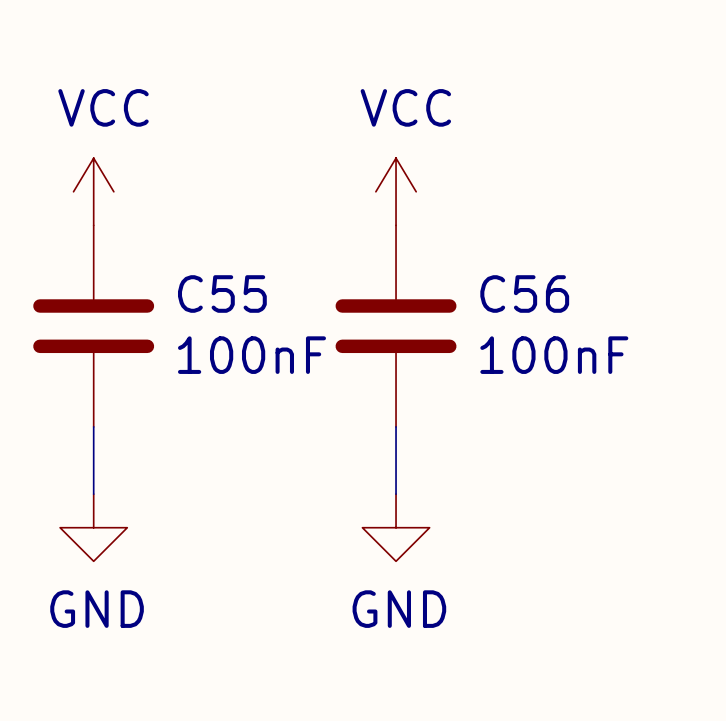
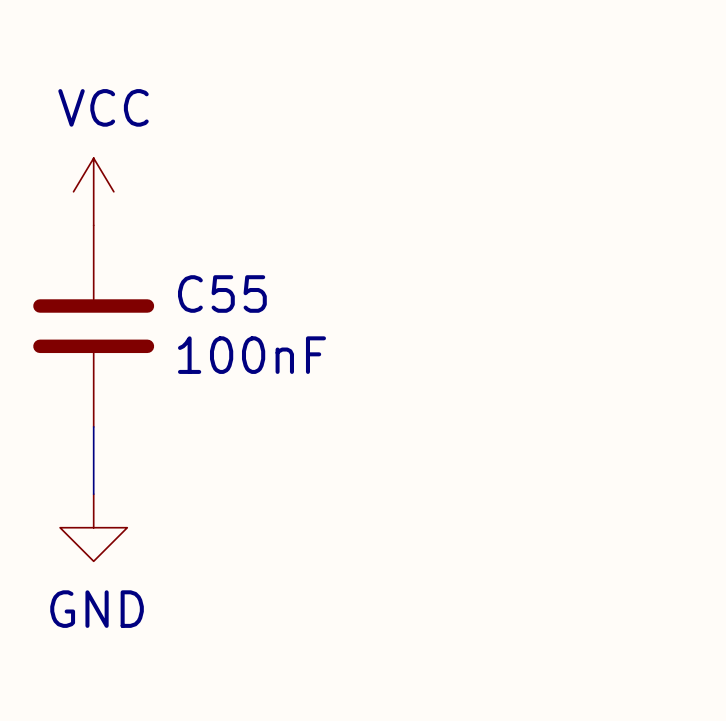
power symbol: VCC (396, 191) -> none
C56: 100nF (396, 326) -> none
wire: (396, 426) (396, 494) -> none
power symbol: GND (396, 527) -> none

